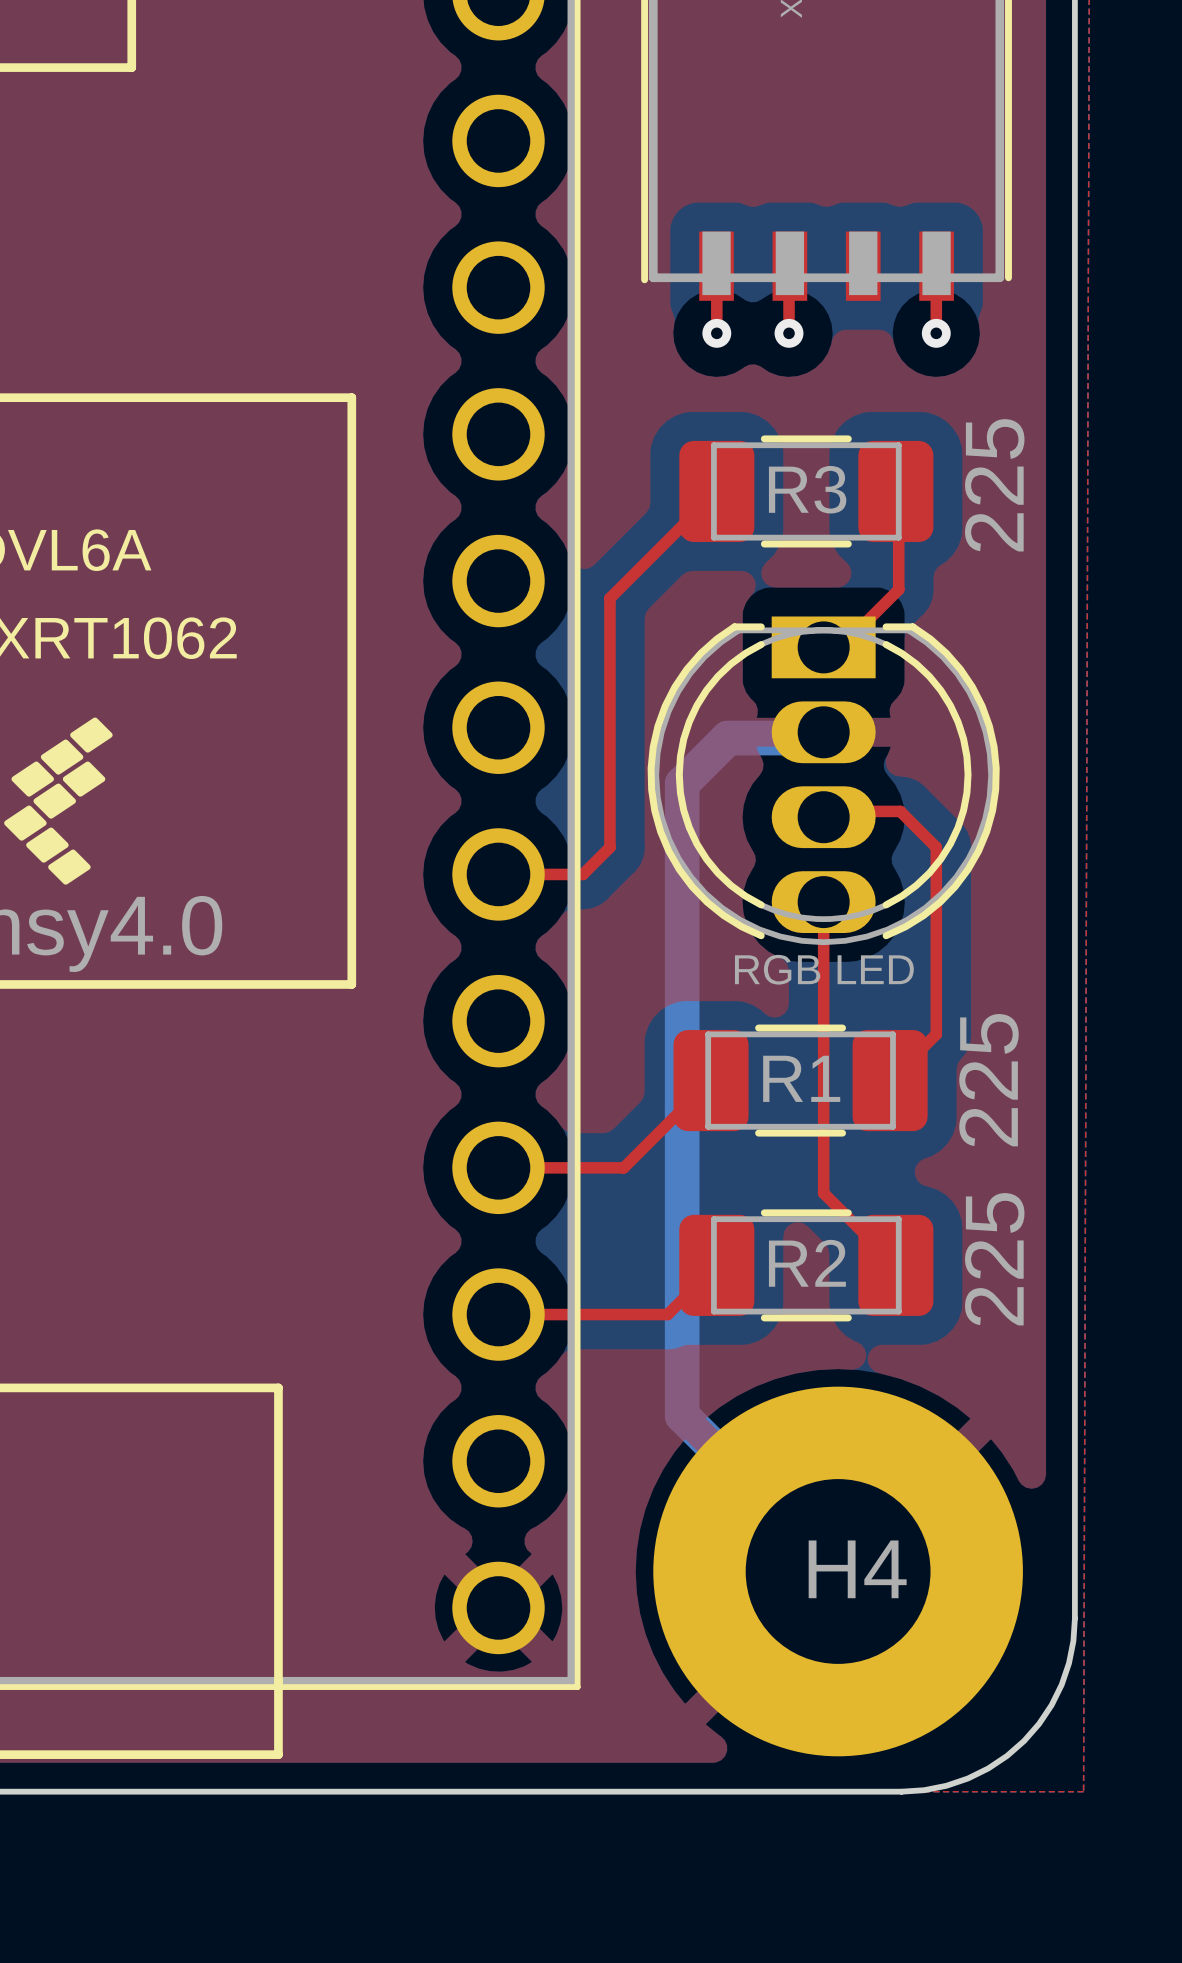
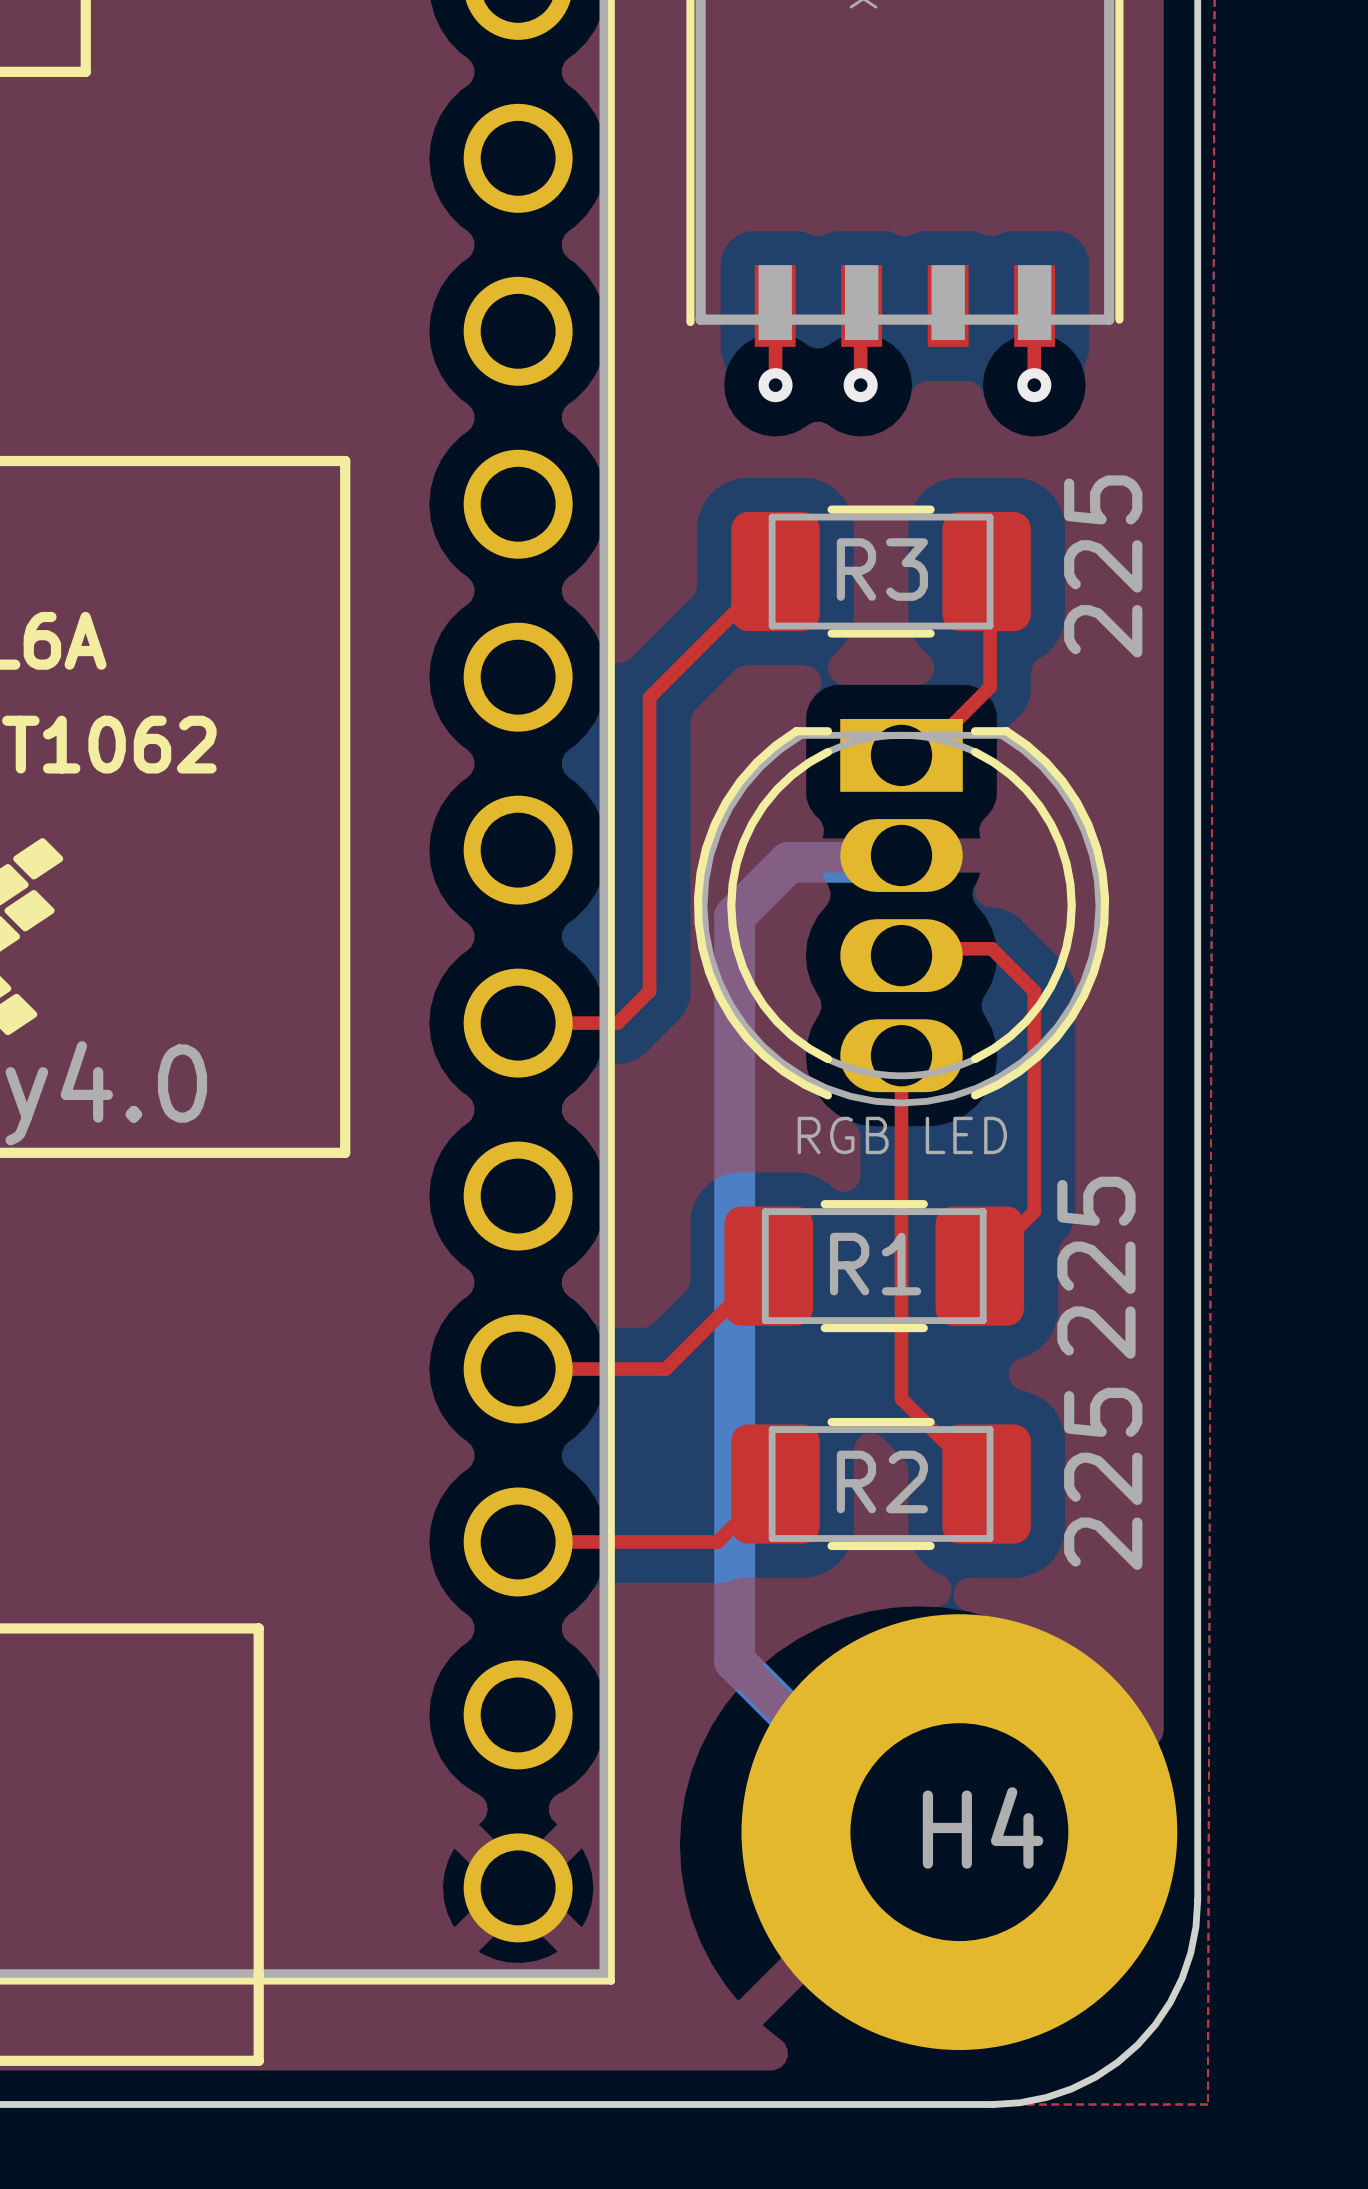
H4 position: (838, 1571) -> (959, 1832)

